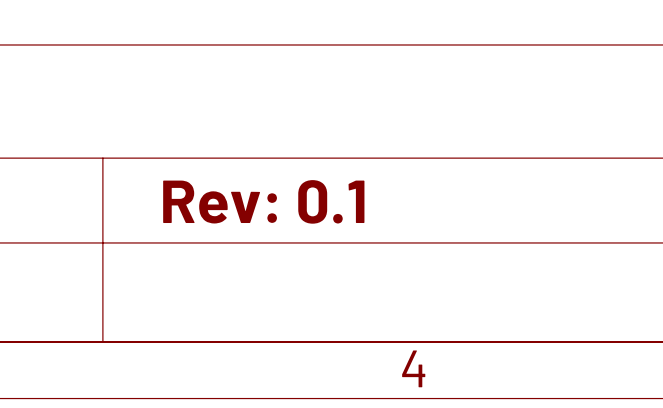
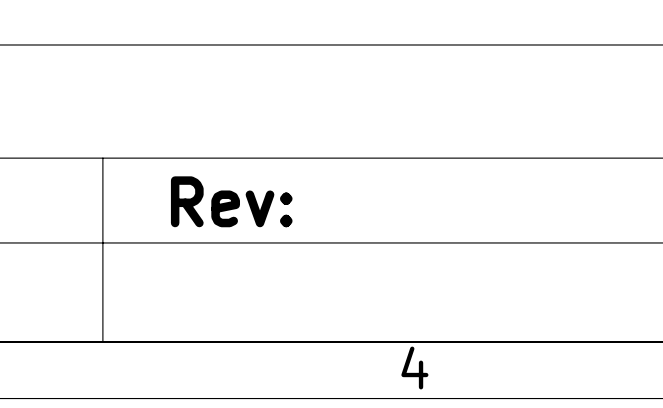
title block: Rev: 0.1 (263, 201) -> Rev: (231, 201)

